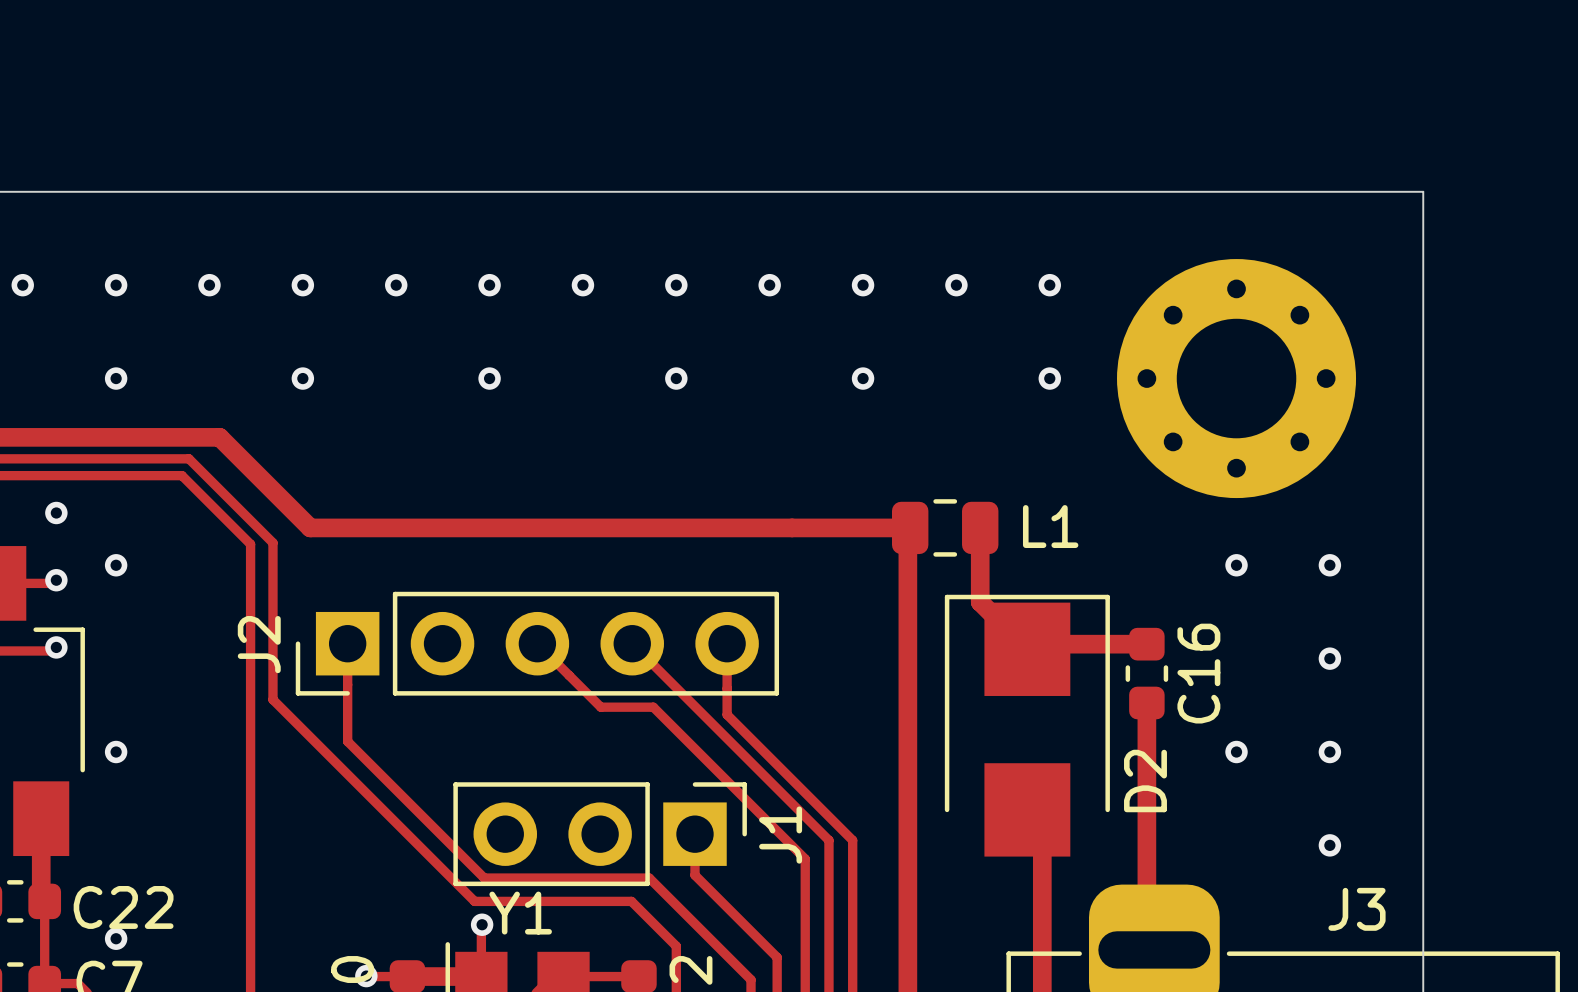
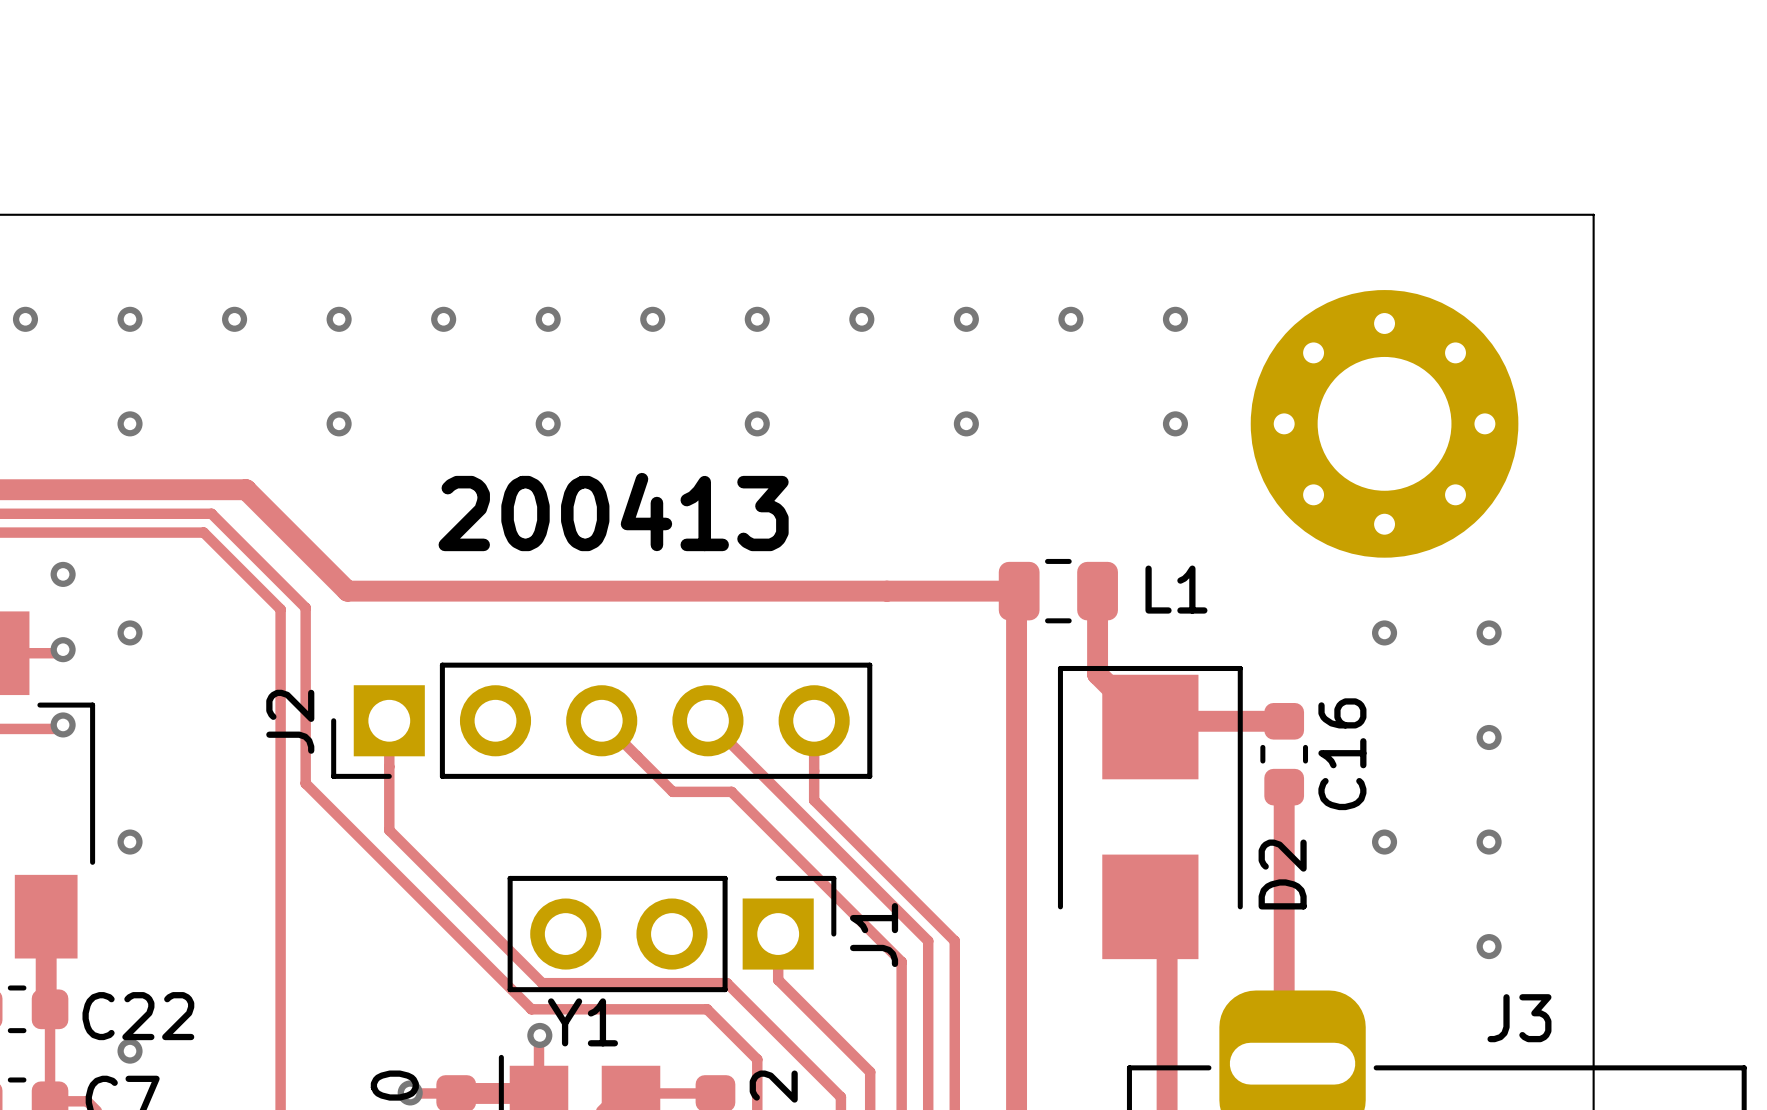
text: none -> 200413 (613, 512)

